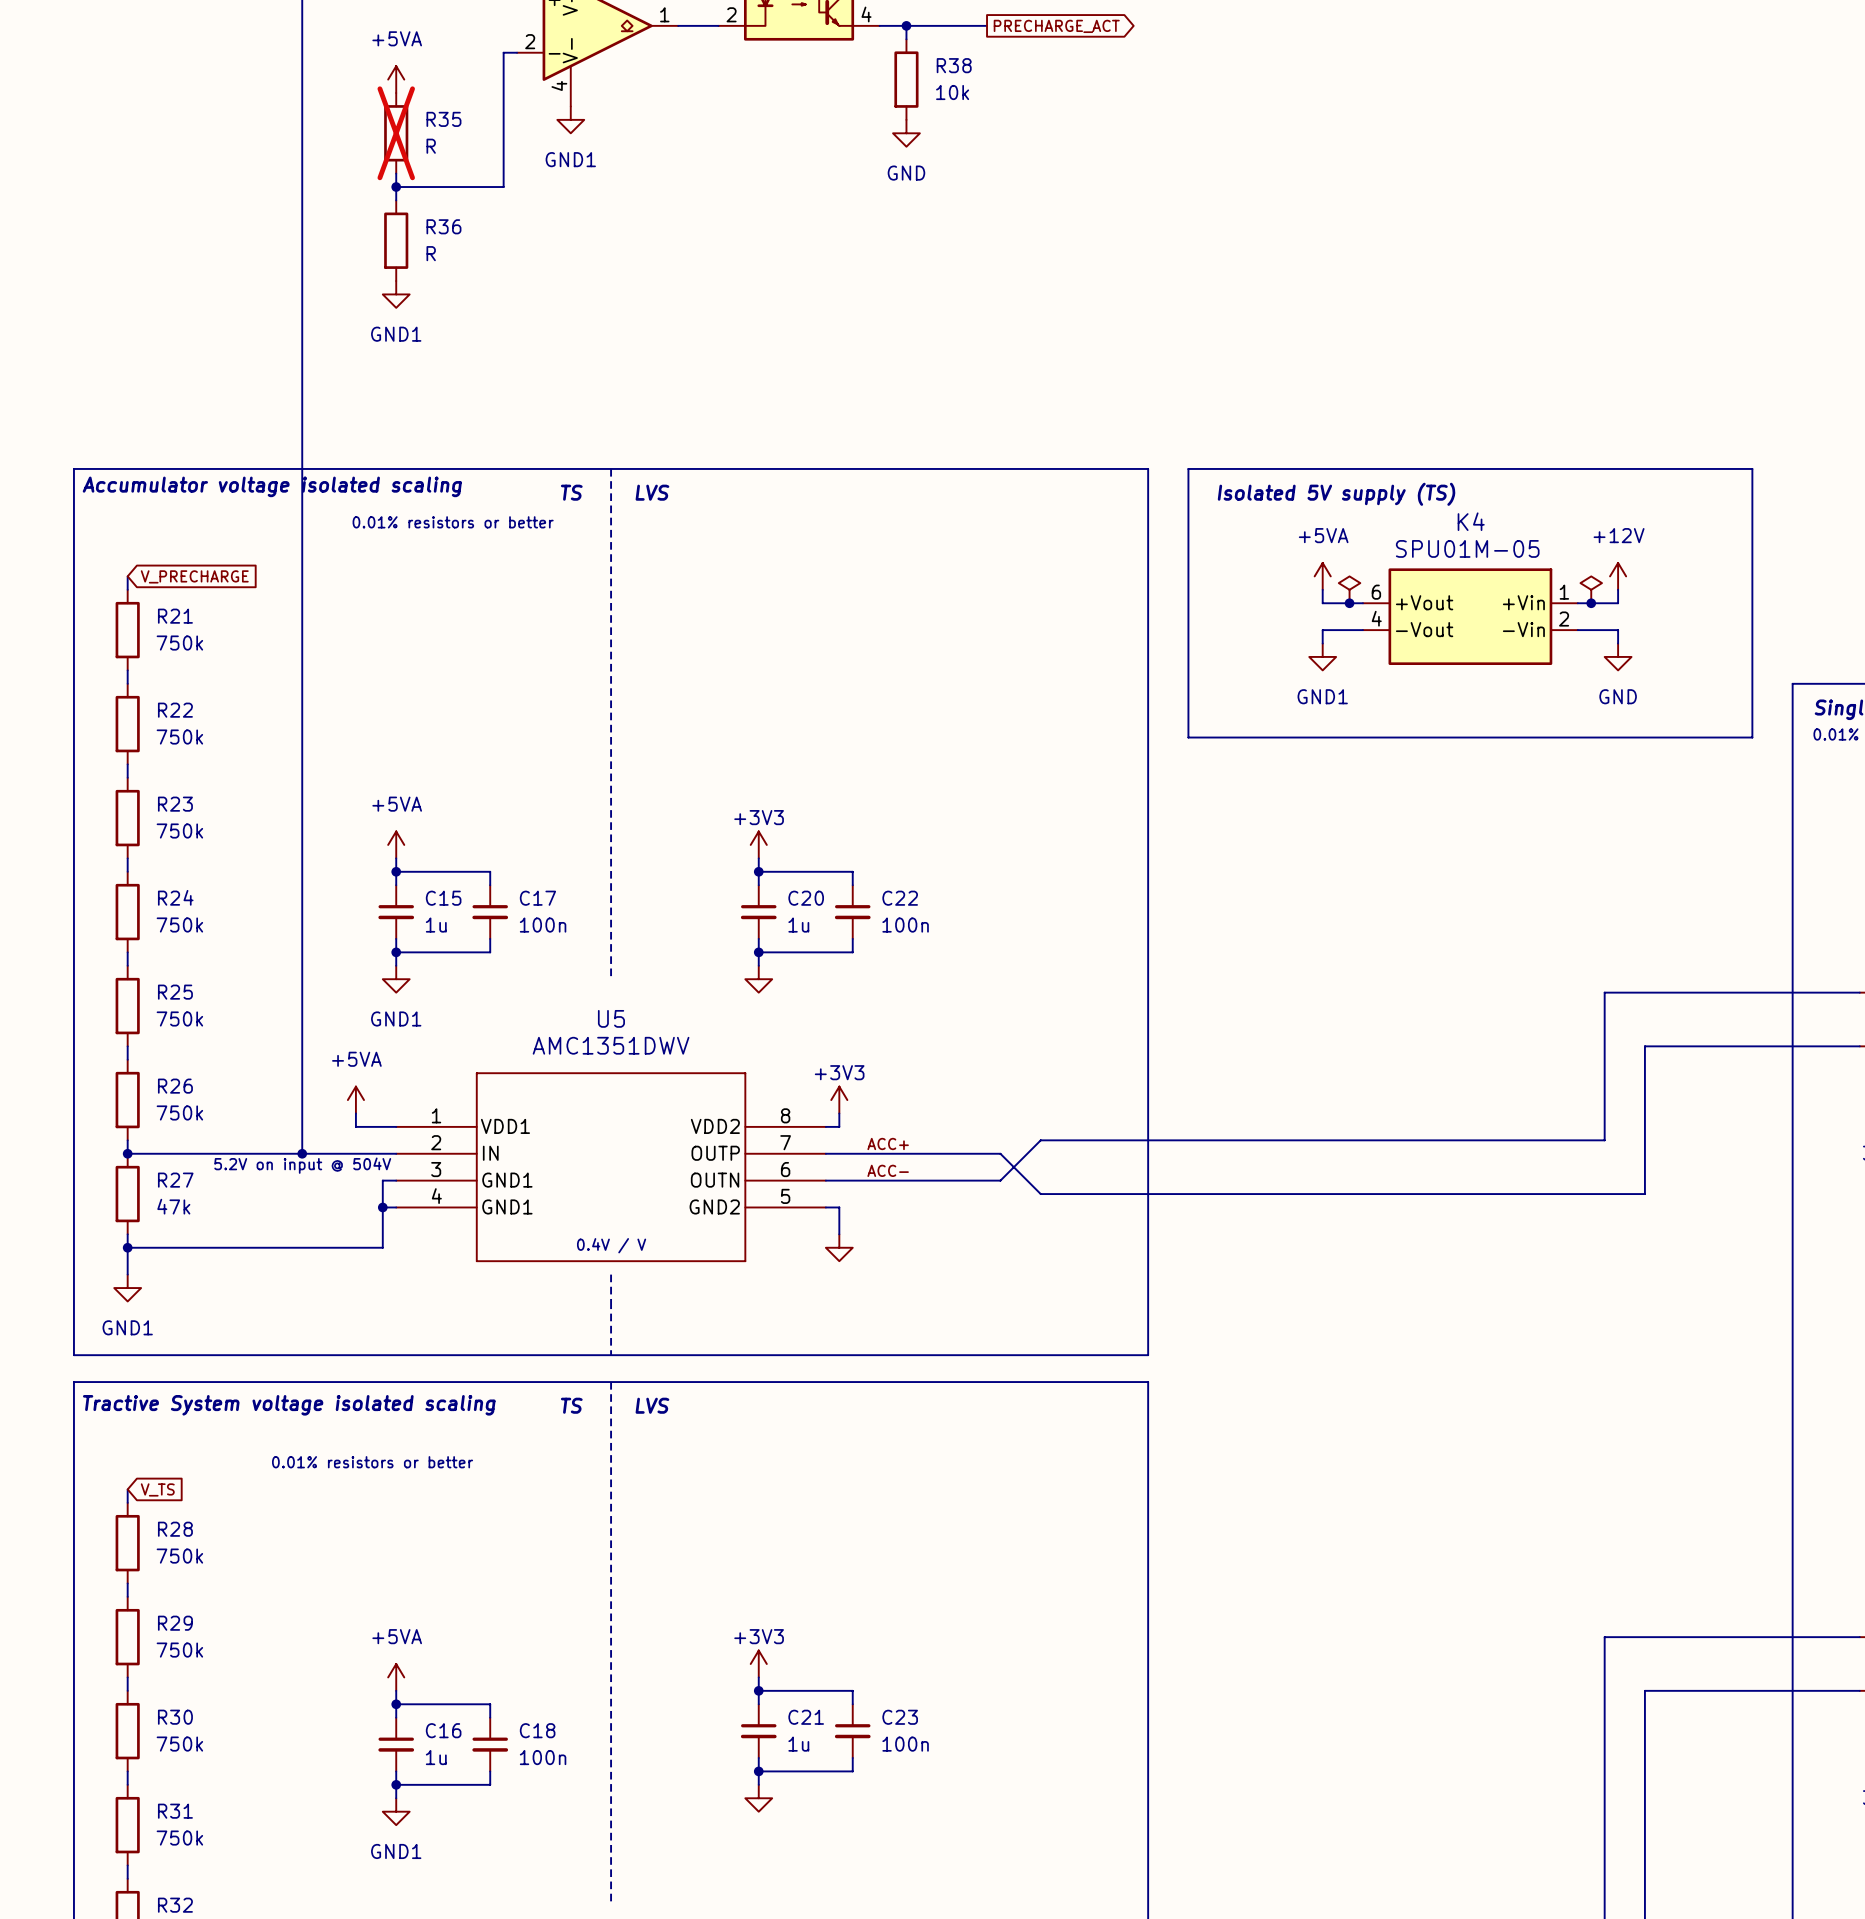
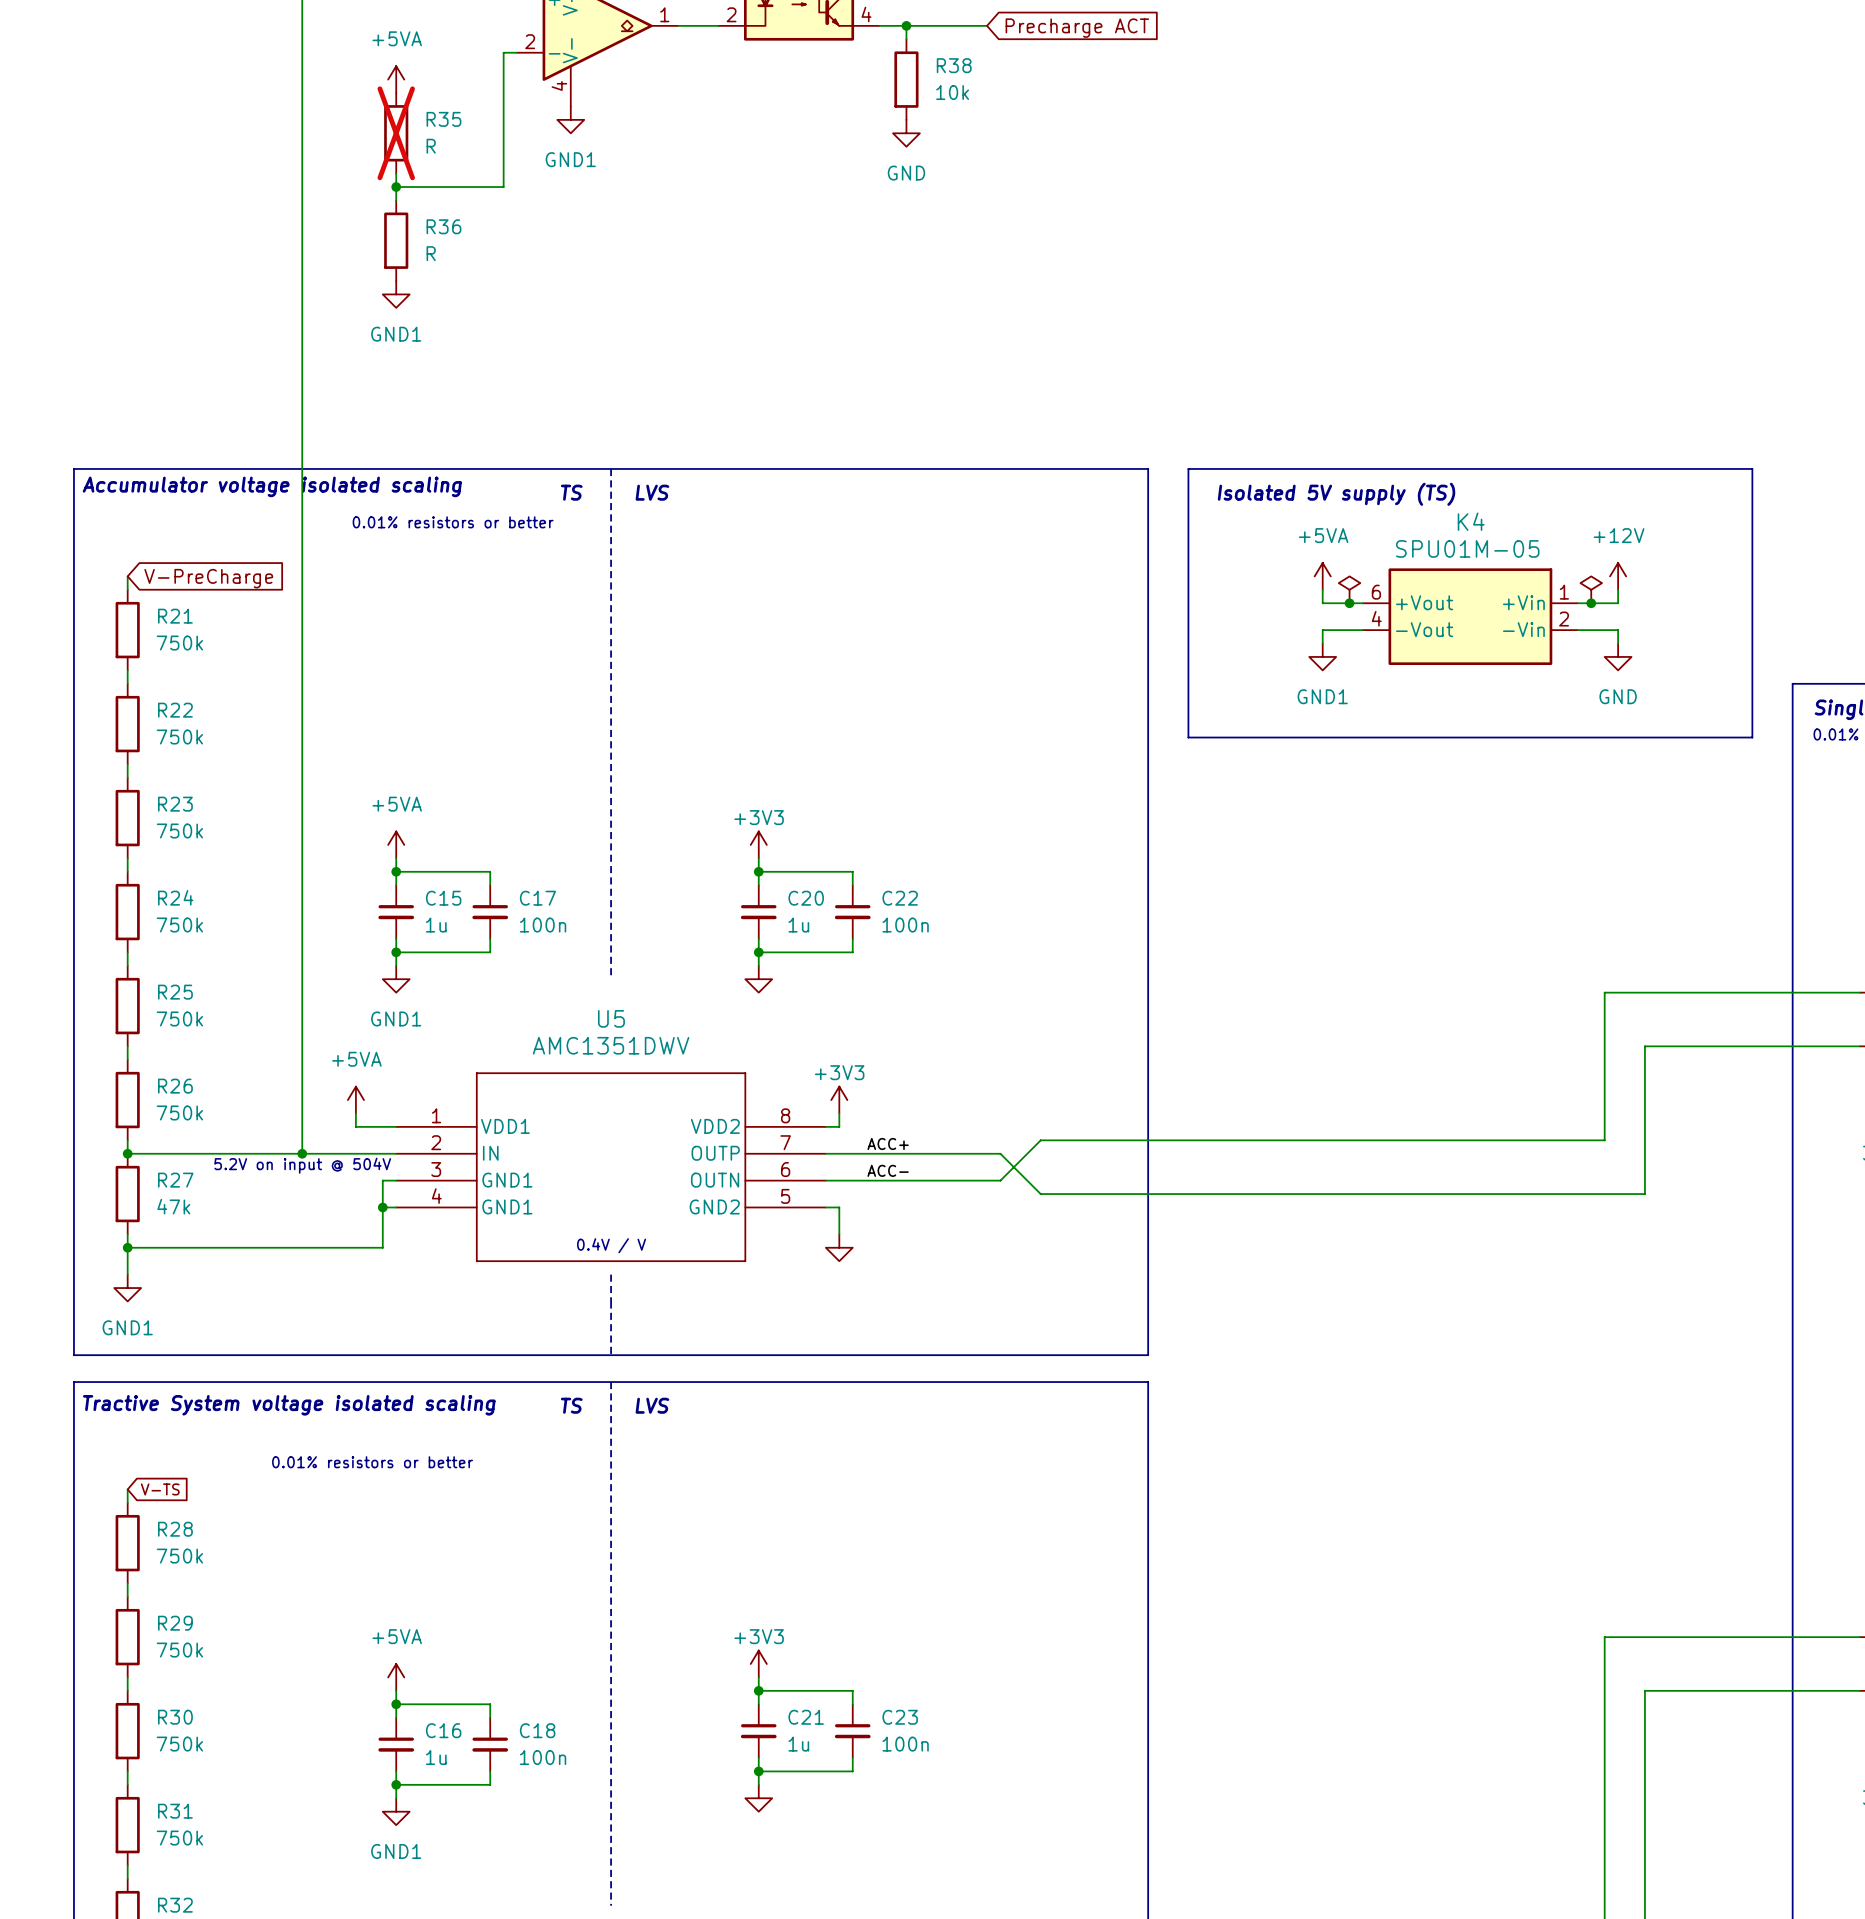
global label shape: output (1056, 26) -> input (1077, 28)
global label: PRECHARGE_ACT (1056, 26) -> Precharge ACT (1077, 28)
global label: V_PRECHARGE (194, 576) -> V-PreCharge (208, 578)
global label: V_TS (157, 1489) -> V-TS (160, 1489)

